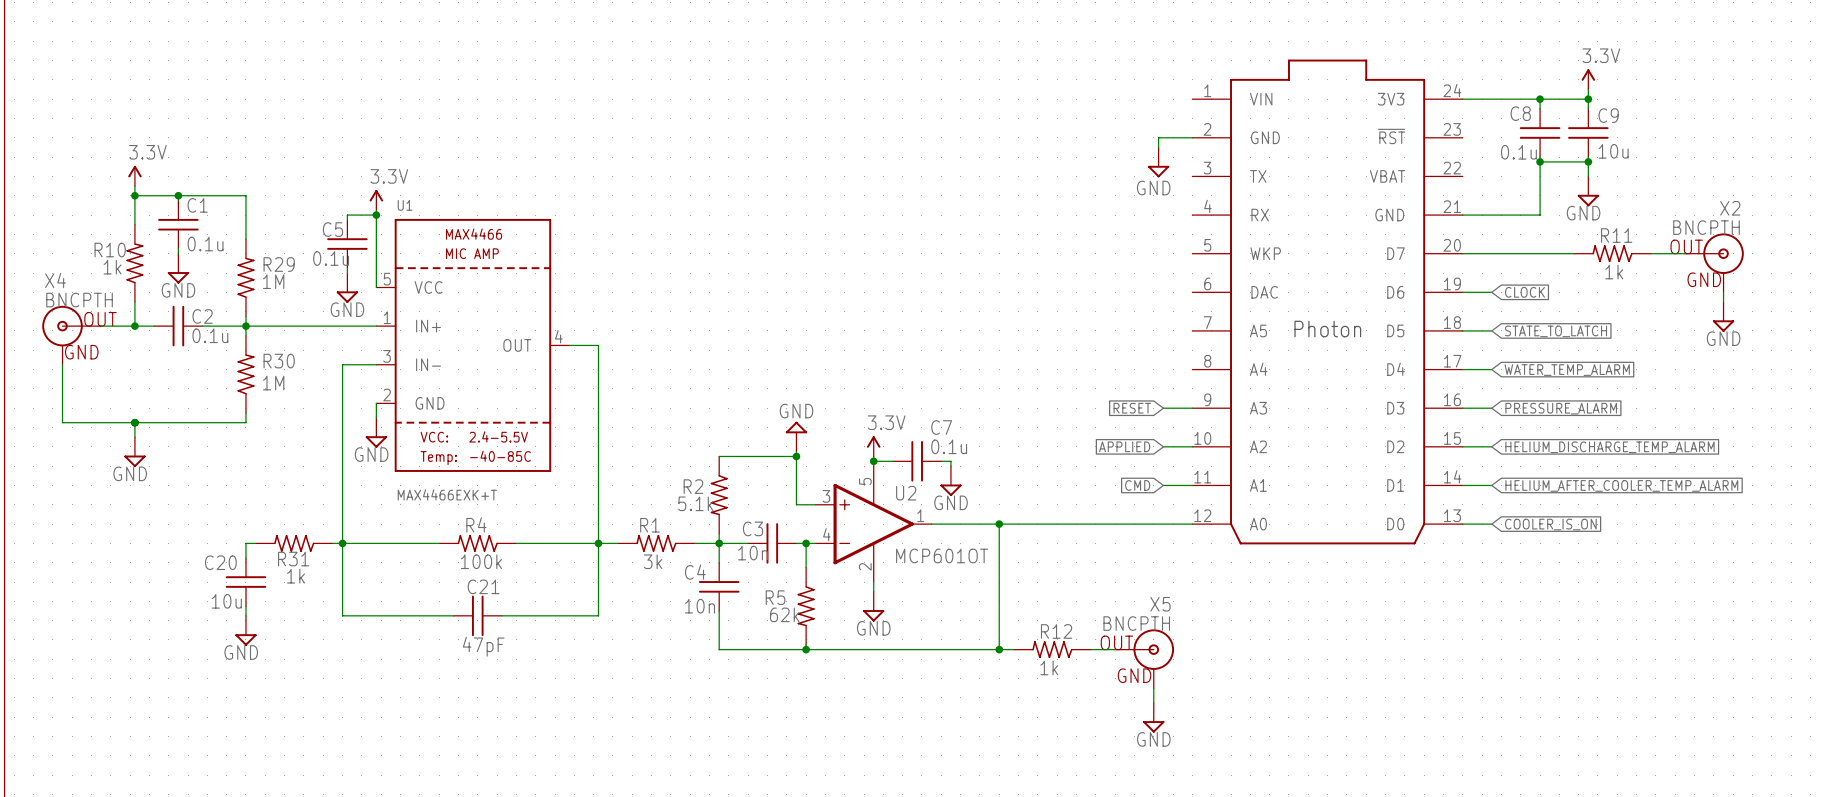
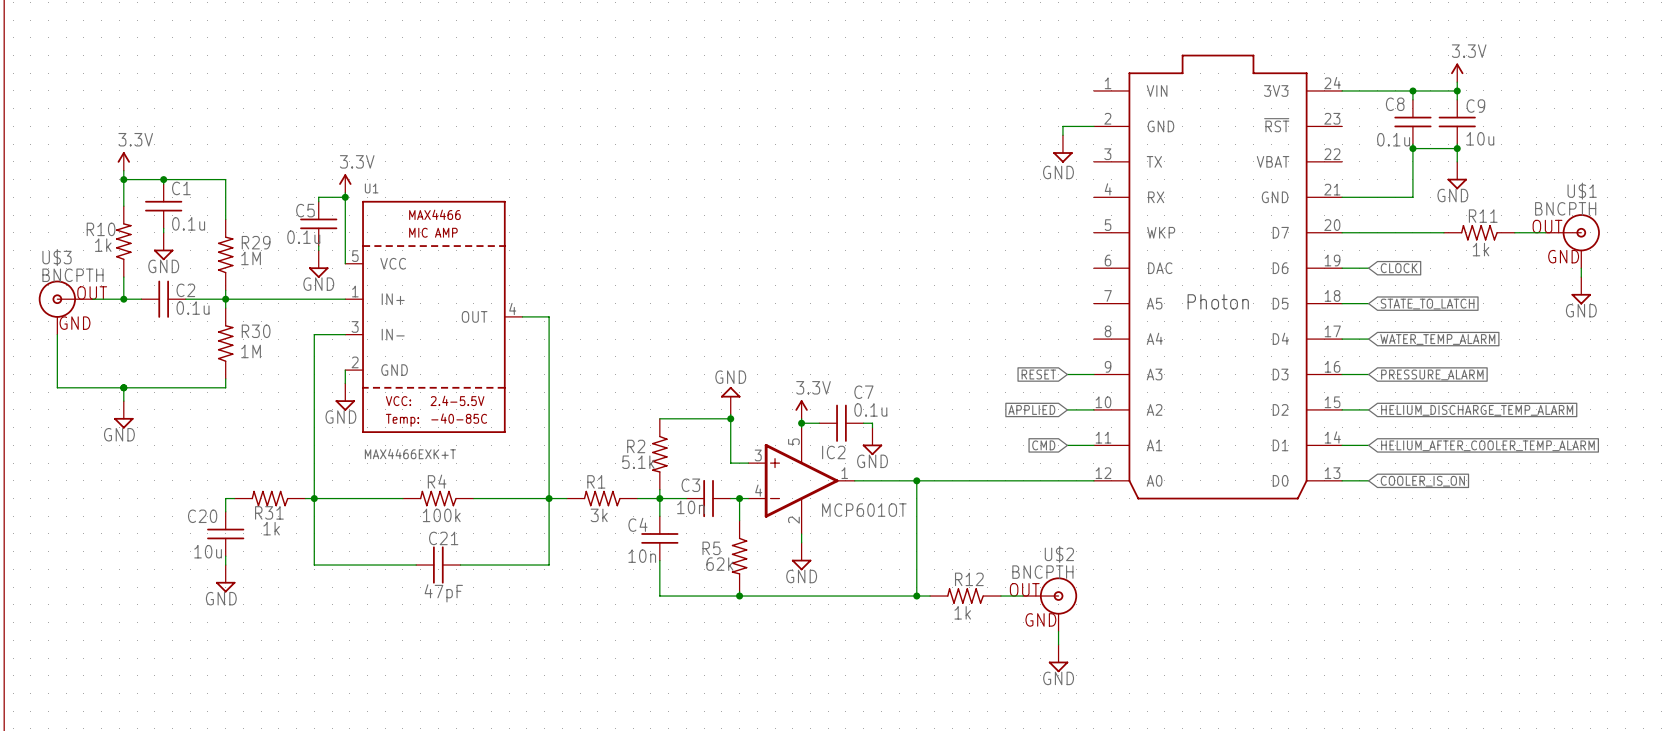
X2 name: X2 (1730, 208) -> U$1 (1582, 191)
X4 name: X4 (55, 280) -> U$3 (57, 257)
U2 name: U2 (906, 493) -> IC2 (833, 452)
X5 name: X5 (1160, 604) -> U$2 (1059, 554)

